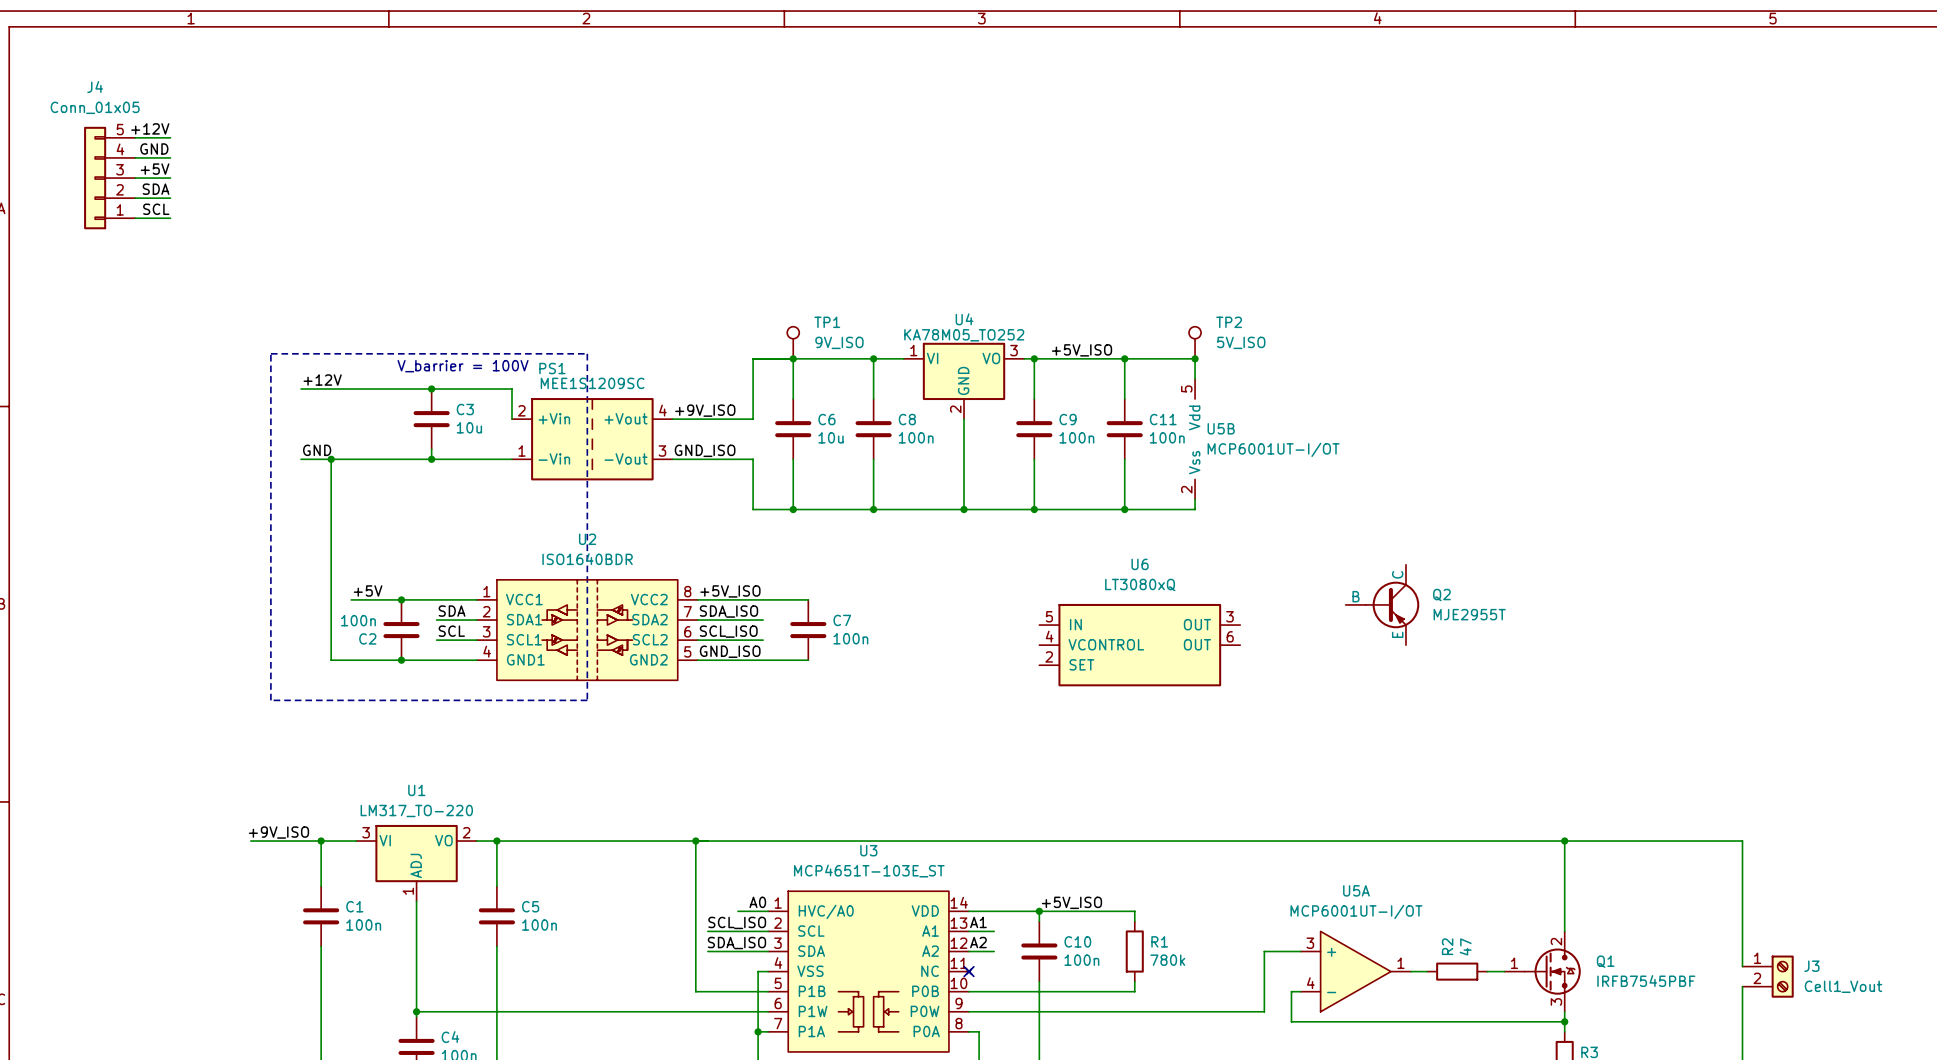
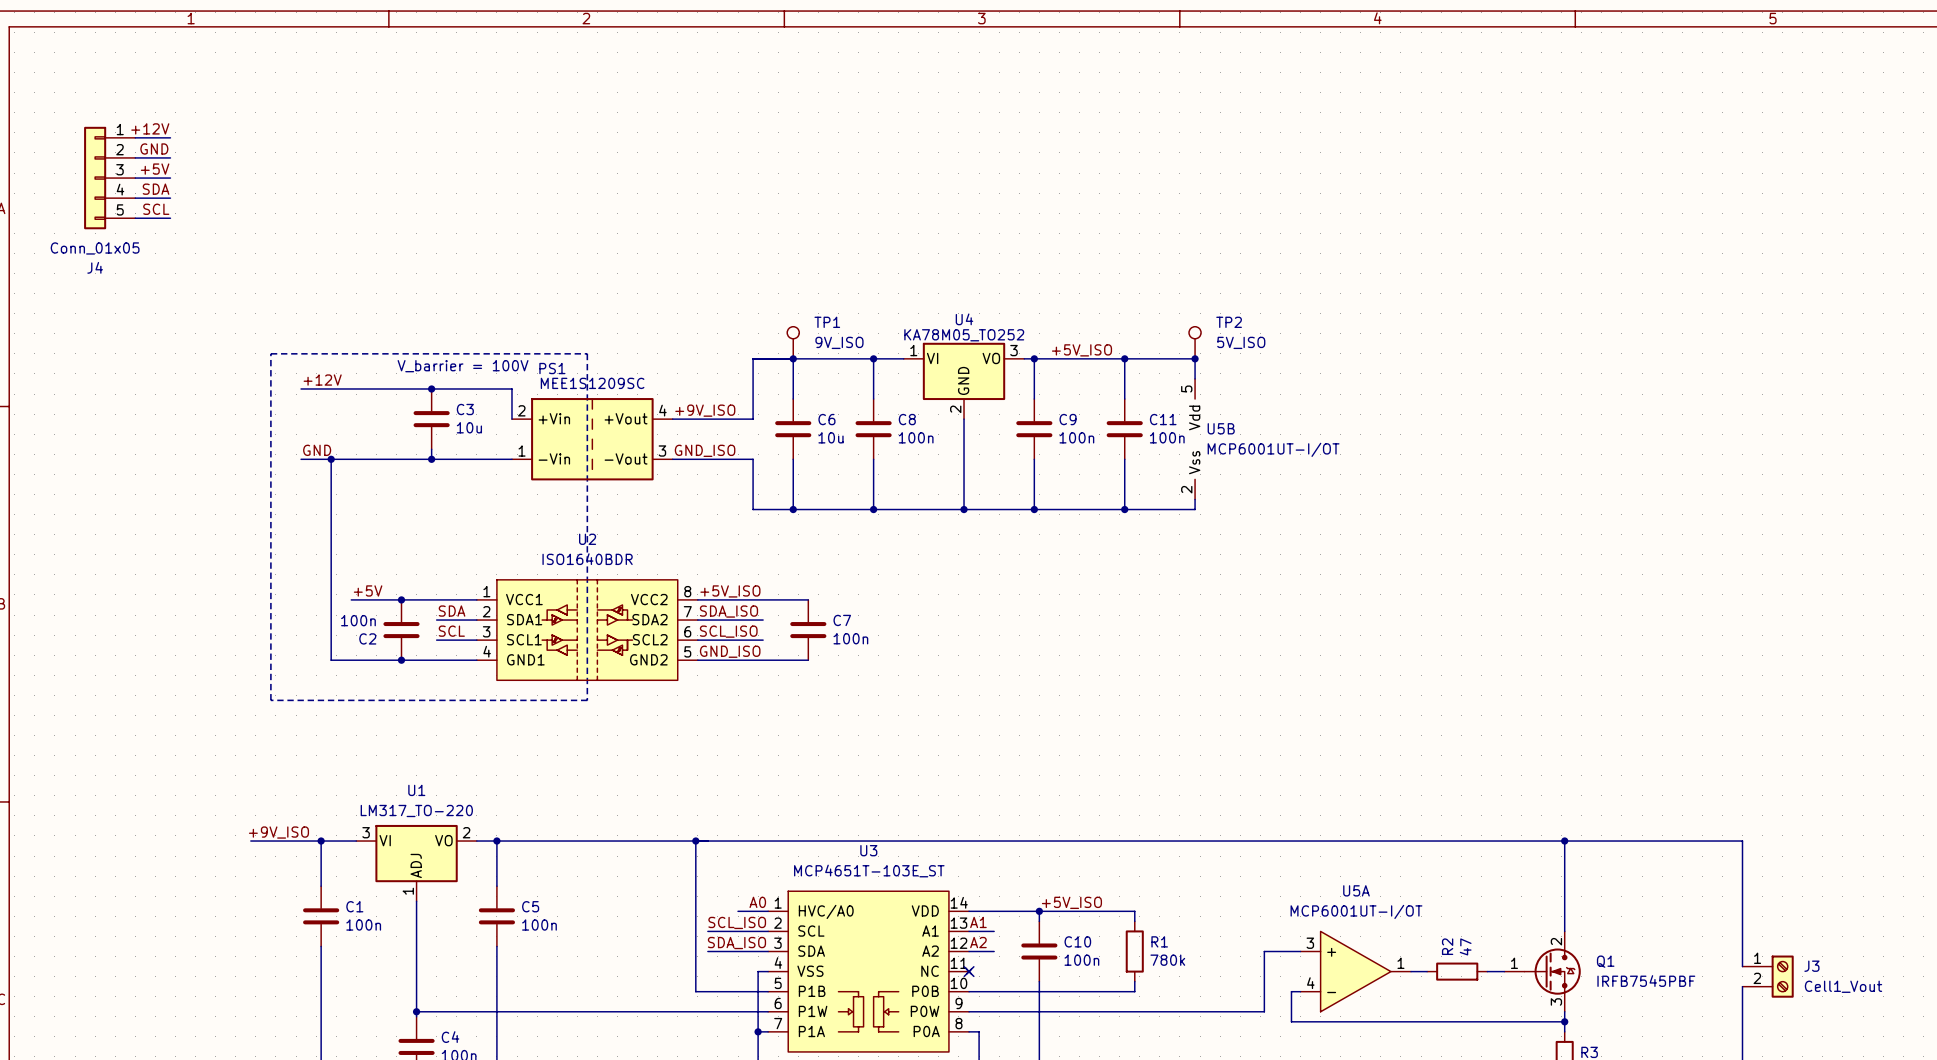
J4 flip: as is (95, 178) -> up-down (95, 178)
Q2: MJE2955T (1382, 604) -> none
U6: LT3080xQ (1139, 645) -> none

